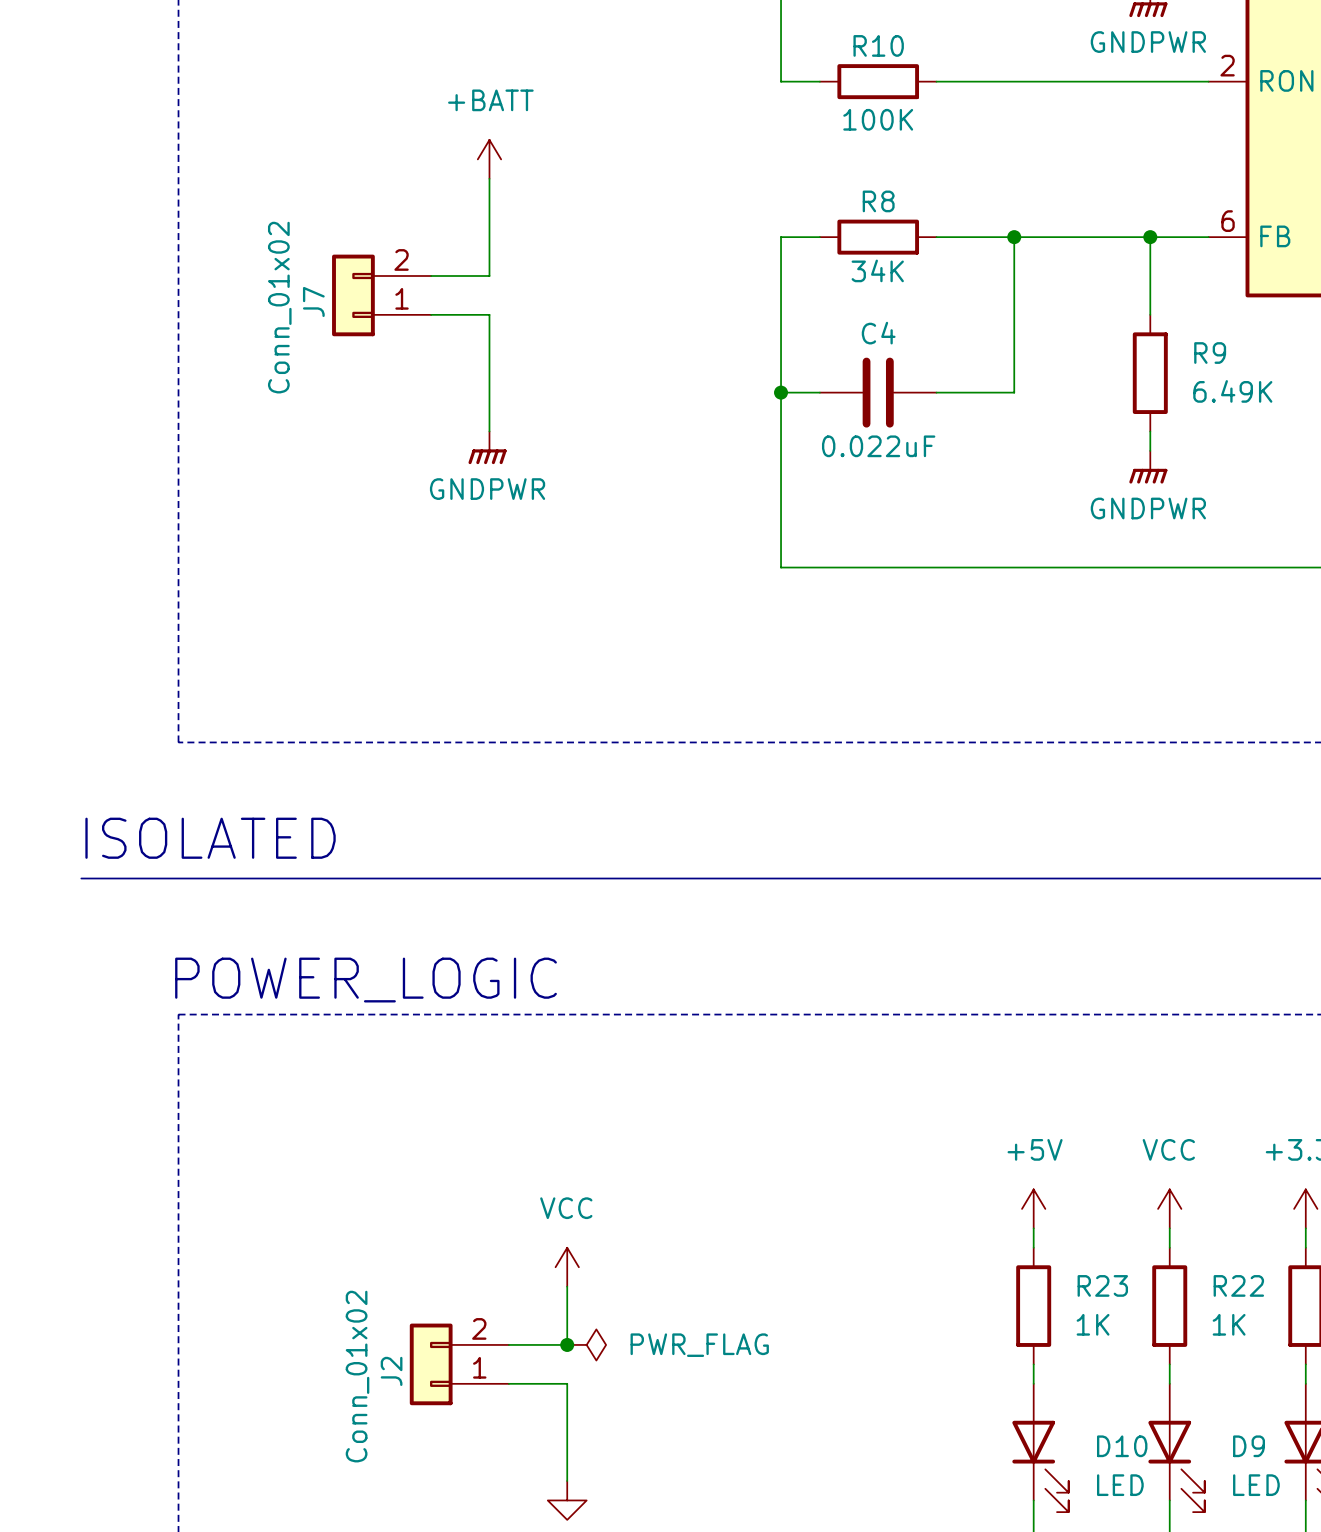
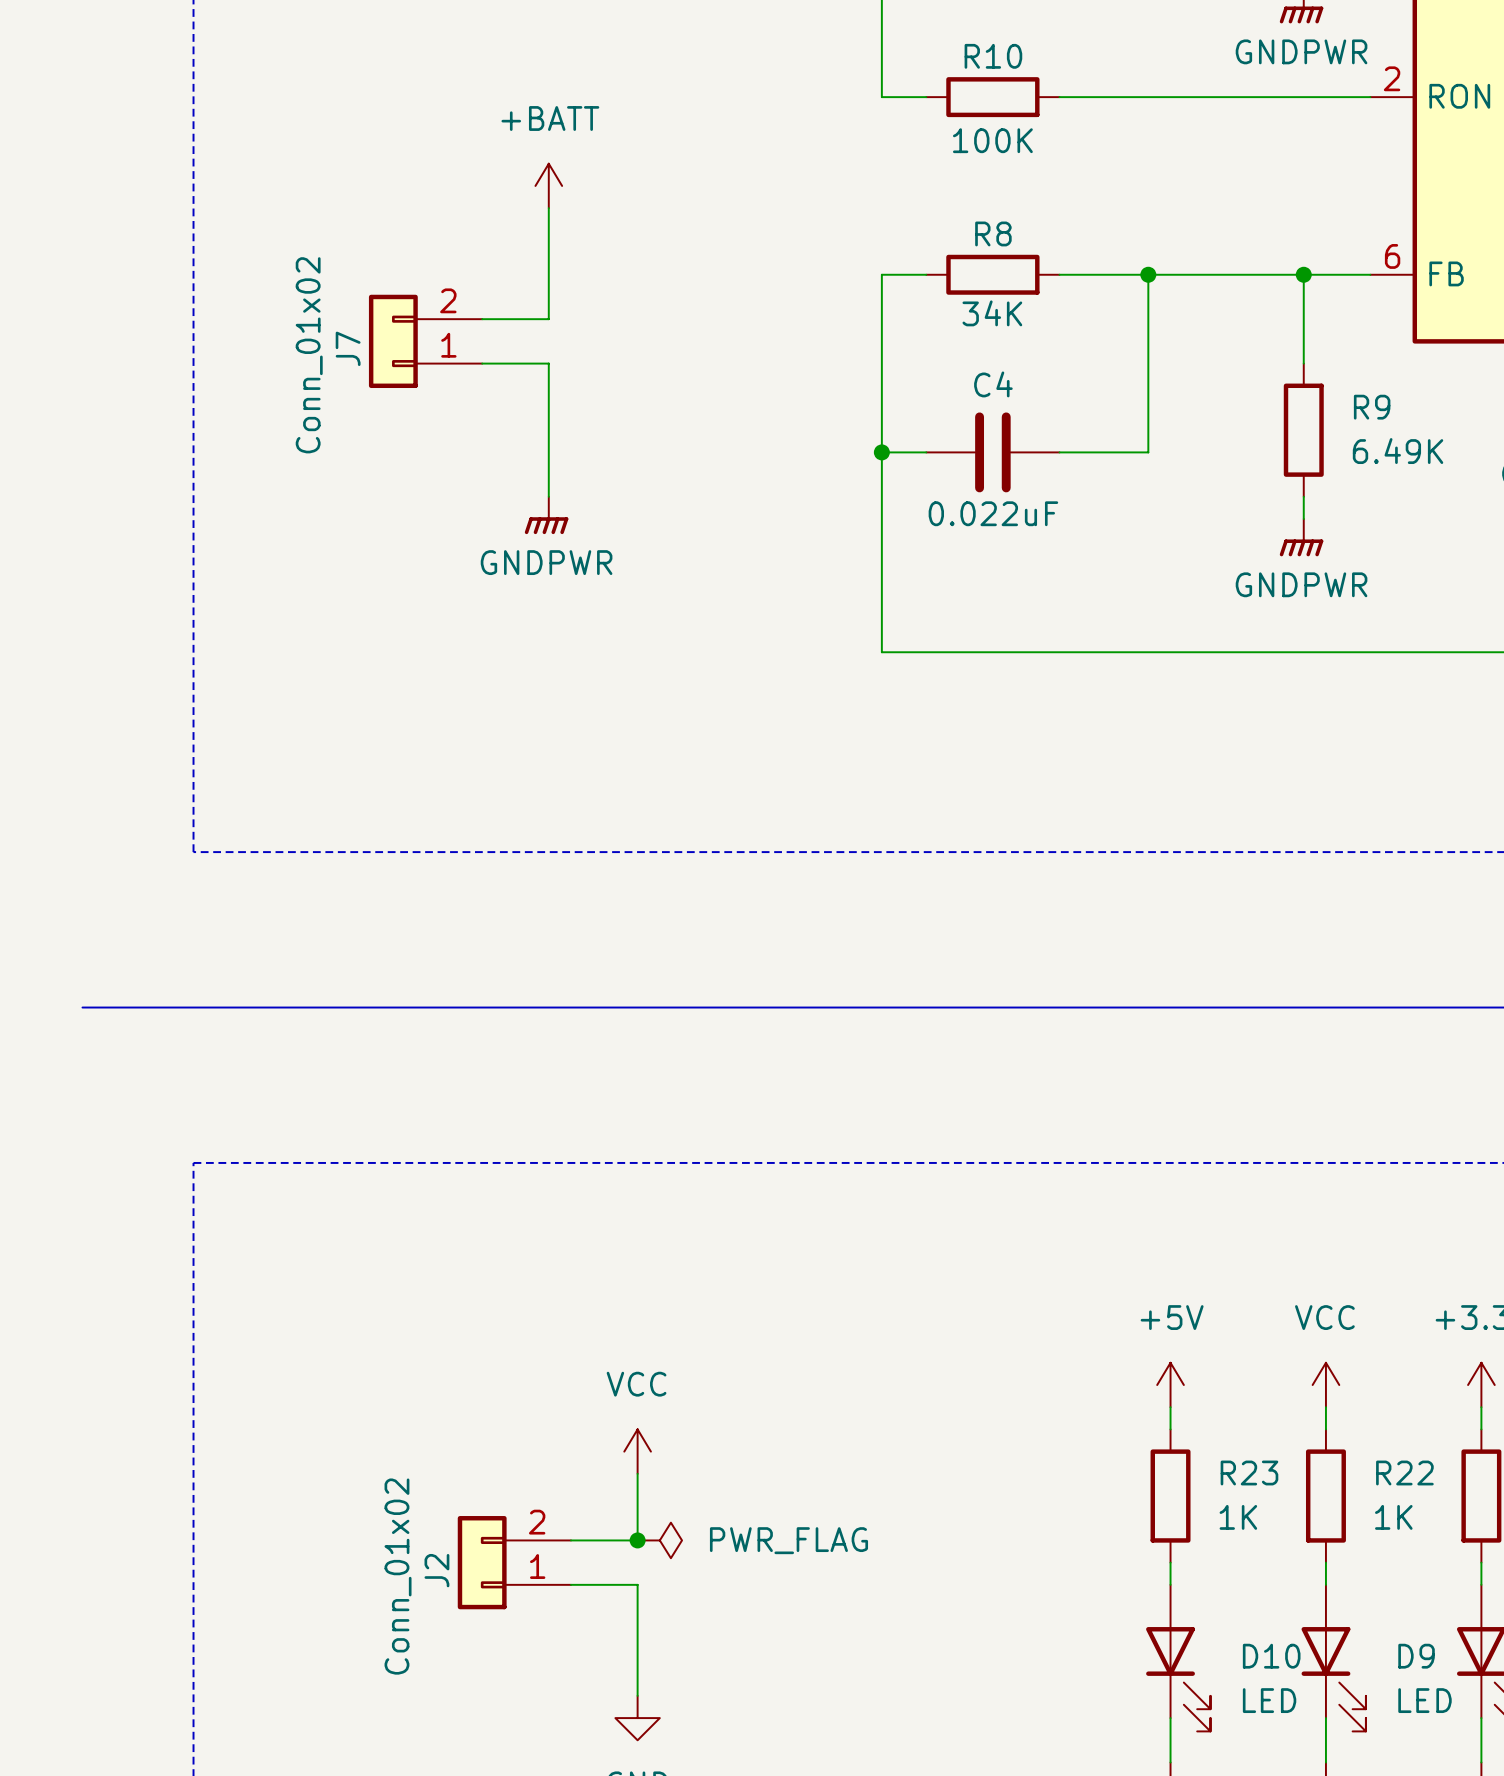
text: ISOLATED (210, 838) -> none
text: POWER_LOGIC (366, 980) -> none

